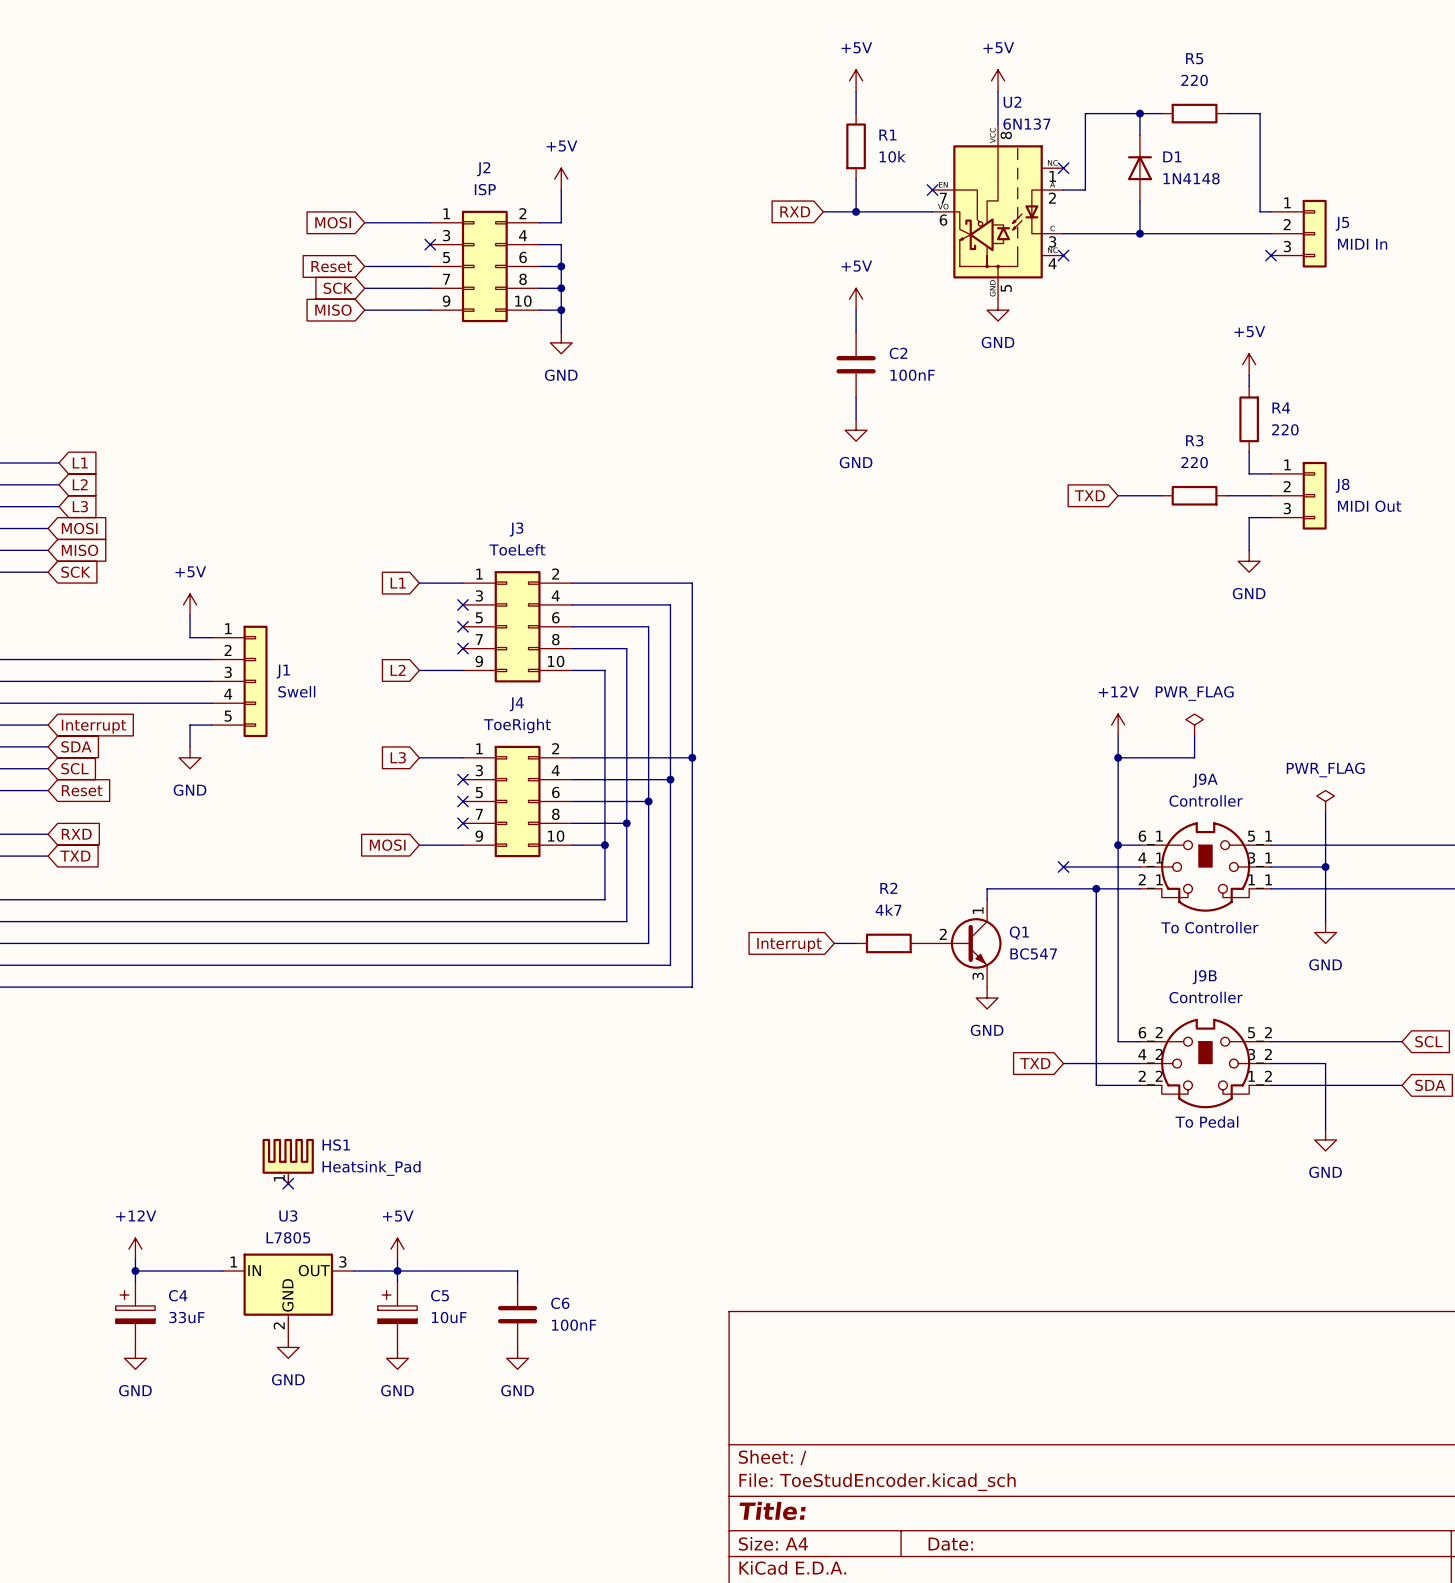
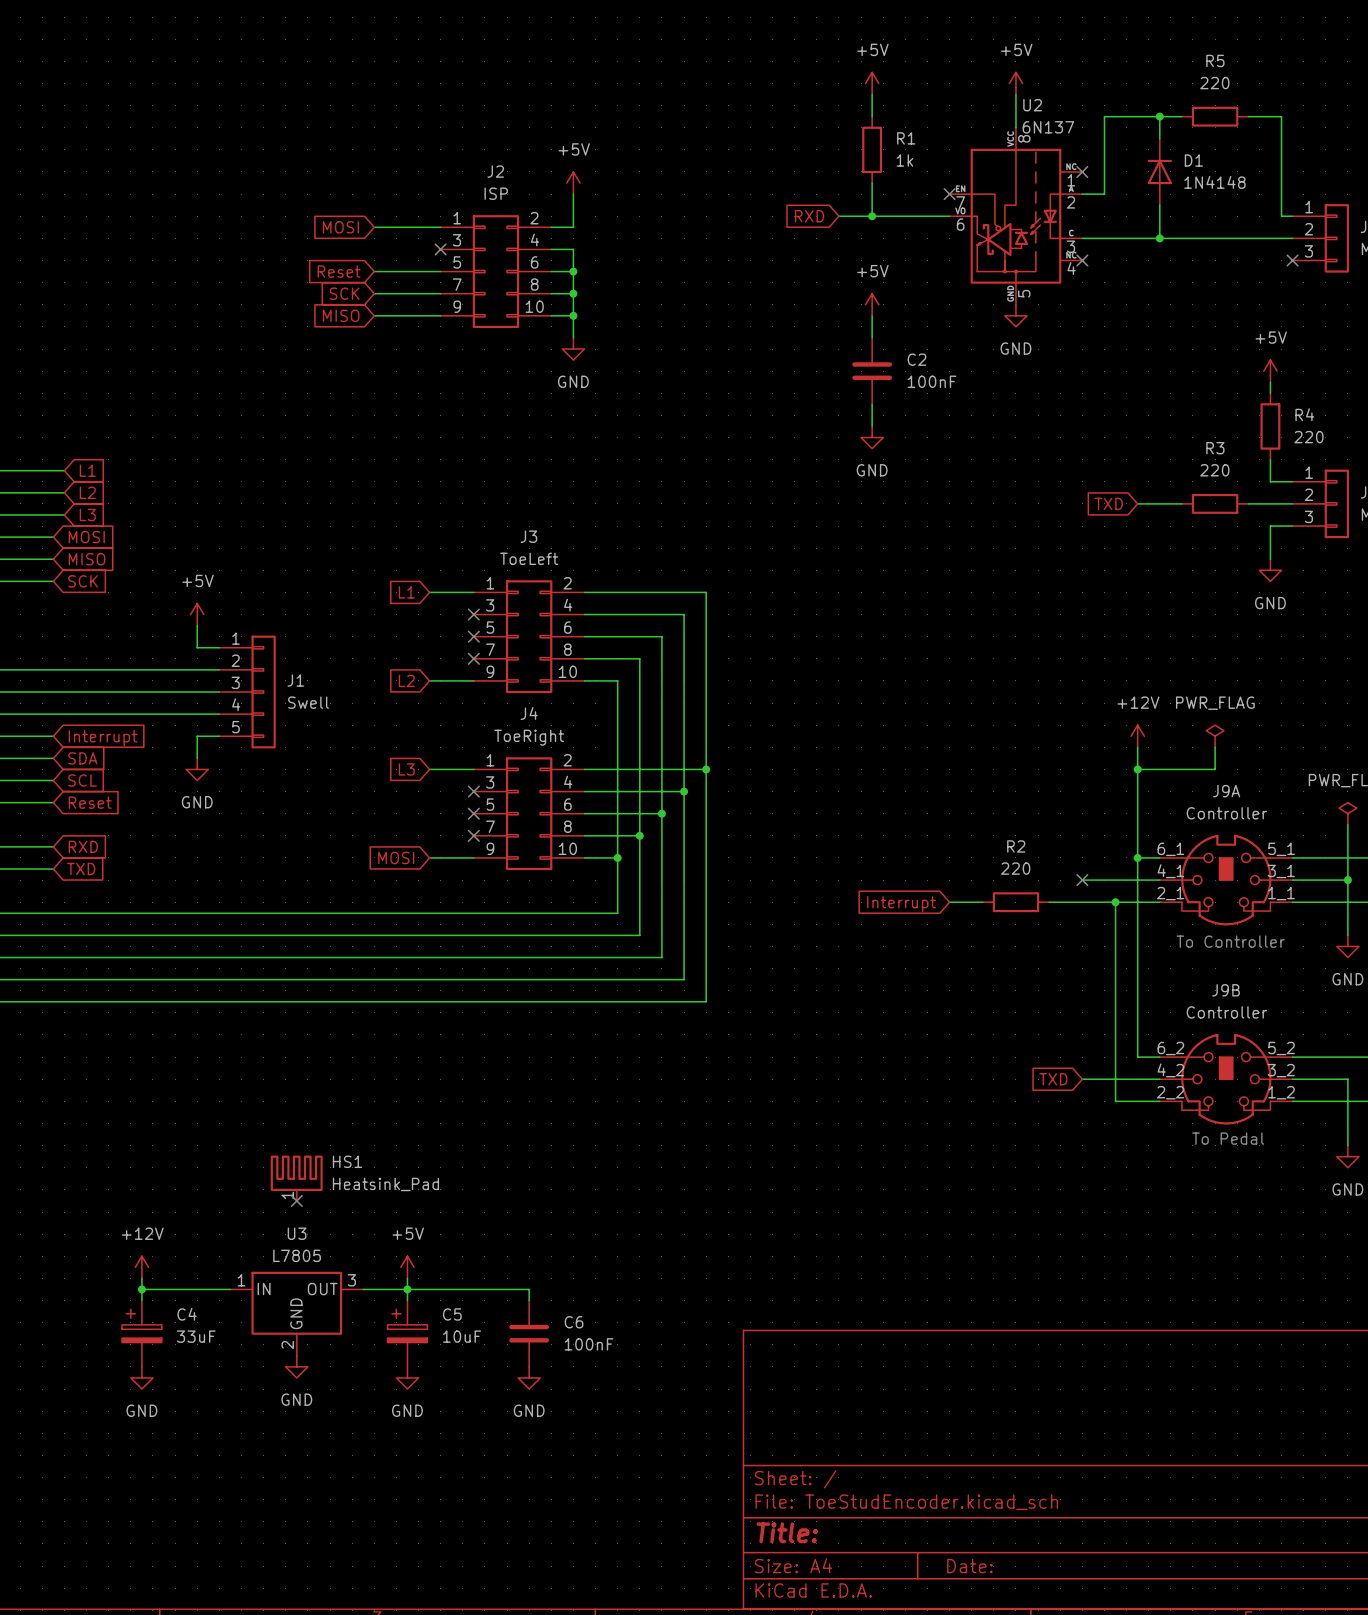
R1 value: 10k (892, 156) -> 1k (904, 160)
wire: none -> (949, 902) (982, 902)
wire: (1030, 888) (987, 888) (987, 899) -> none
R2 value: 4k7 (888, 910) -> 220 (1015, 868)
wire: (834, 943) (856, 943) -> none
R2 position: (888, 943) -> (1015, 902)
Q1: BC547 (961, 943) -> none
global label position: Interrupt (789, 944) -> Interrupt (901, 904)
power symbol: GND (987, 998) -> none

